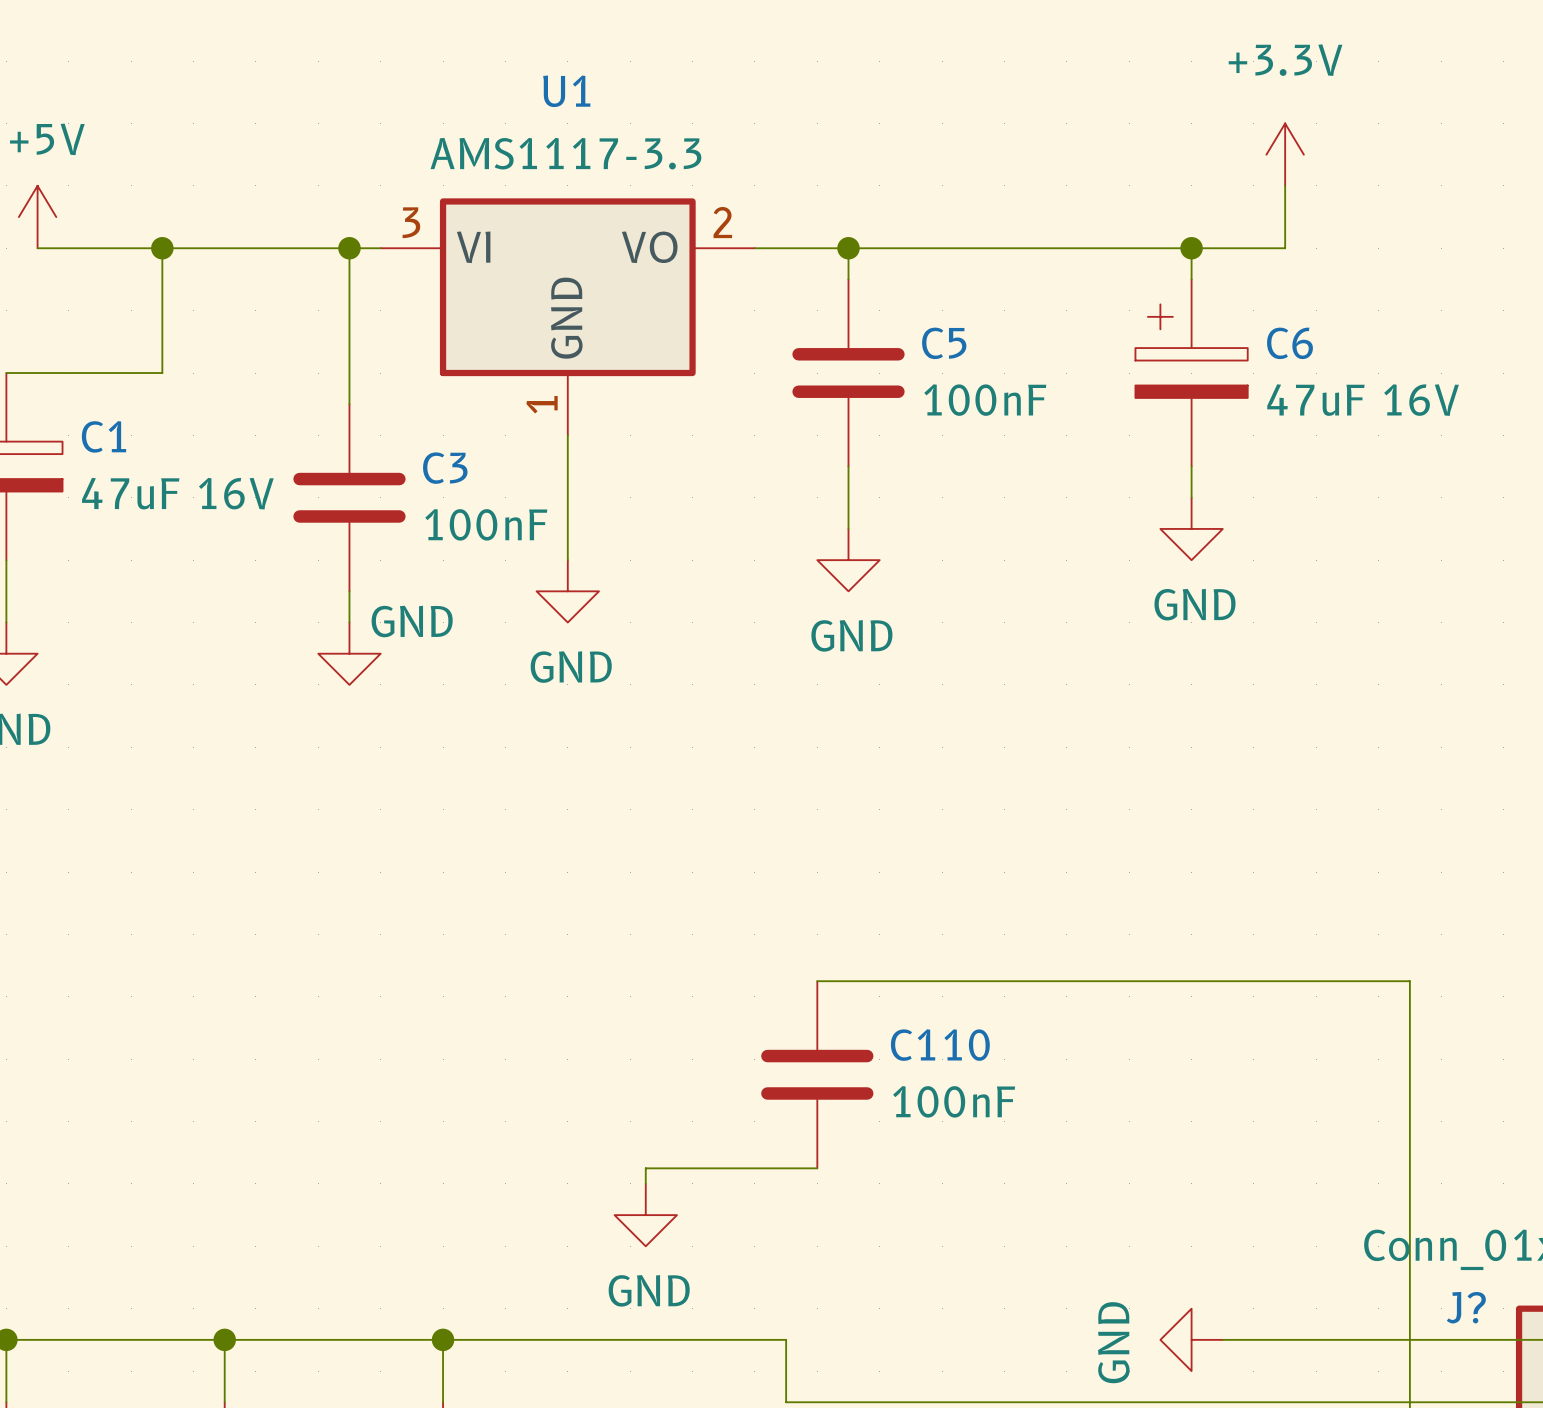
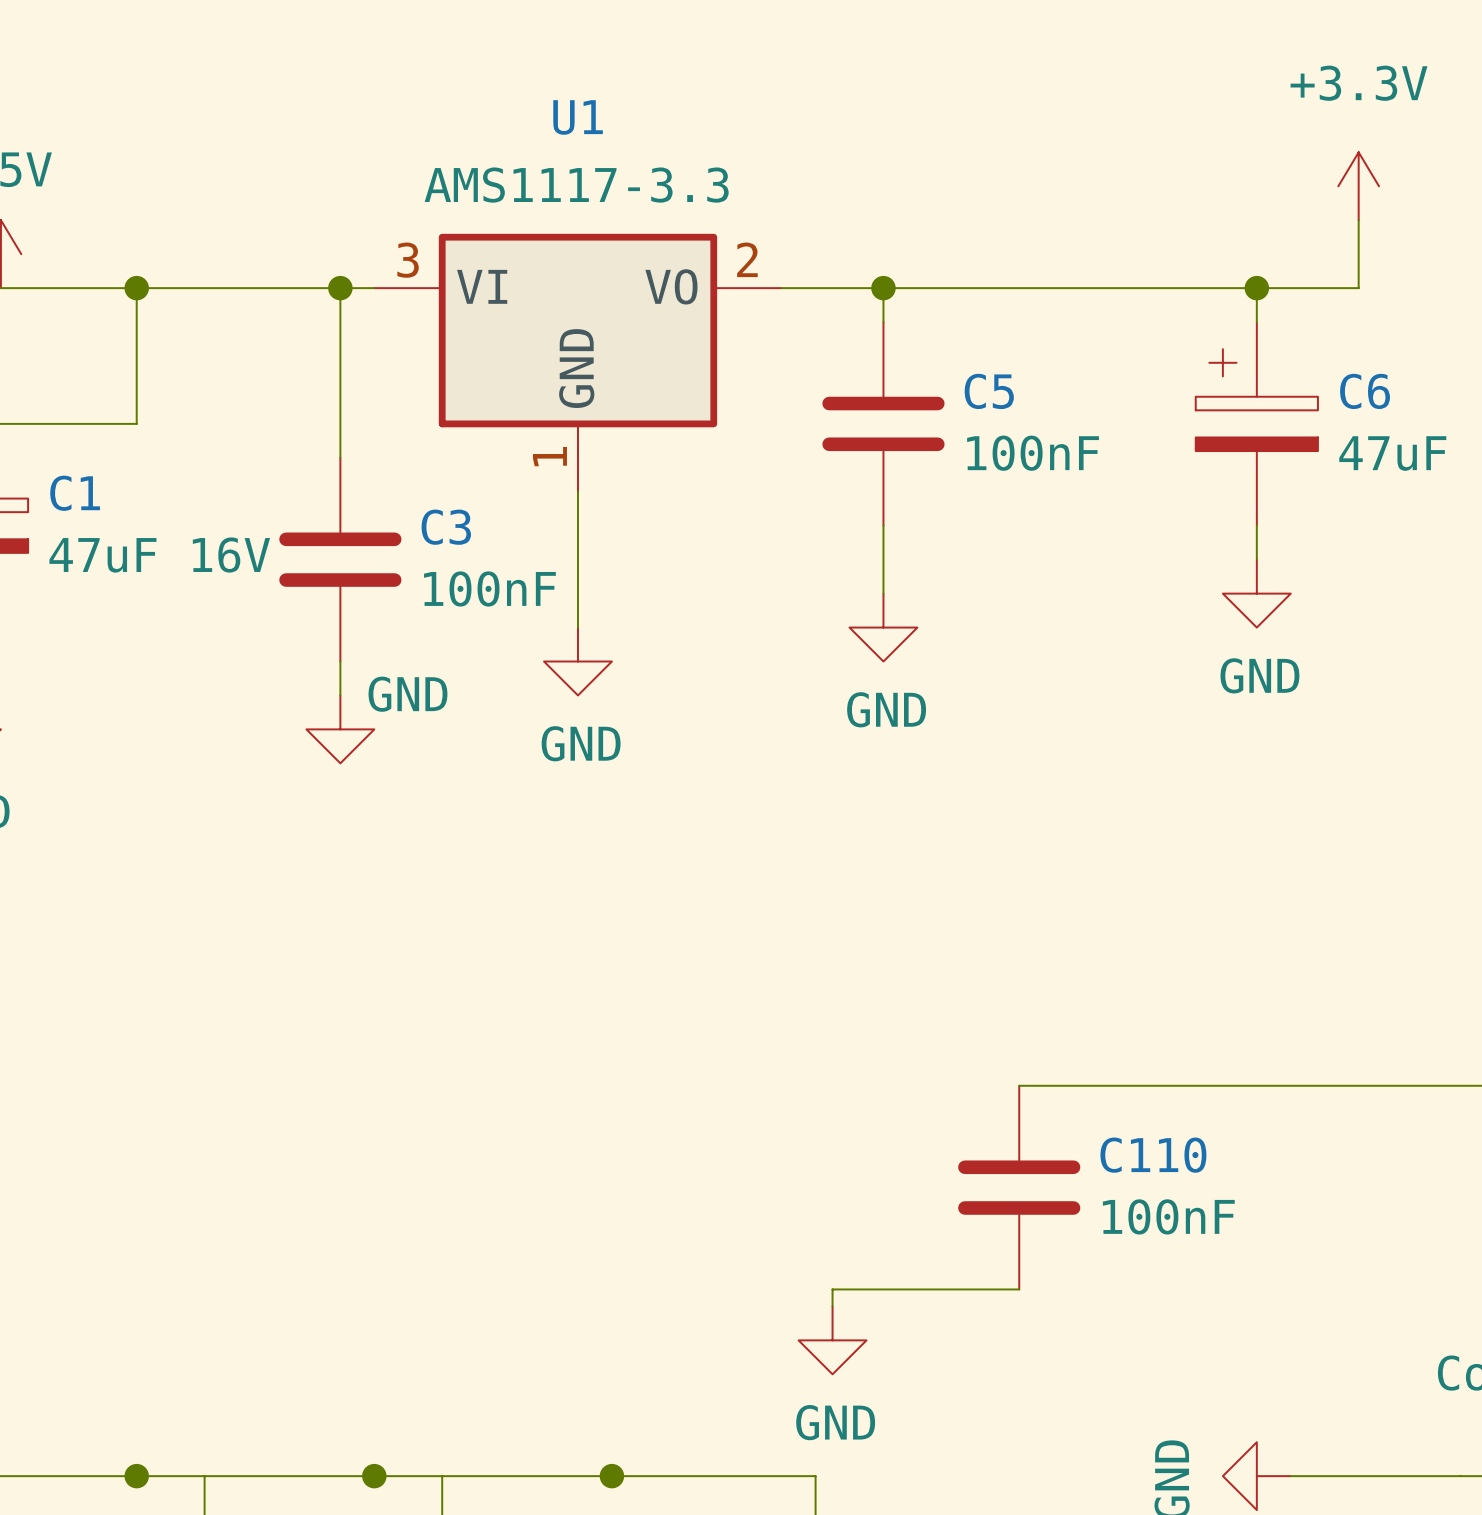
wire: (817, 981) (973, 981) -> (849, 1289) (1019, 1289)
C110 position: (817, 1074) -> (1019, 1187)
wire: (801, 1168) (645, 1168) (645, 1183) -> (832, 1289) (832, 1306)
power symbol position: GND (645, 1215) -> GND (832, 1340)
junction position: (224, 1339) -> (136, 1476)
junction position: (443, 1339) -> (374, 1476)
junction: none -> (611, 1476)

